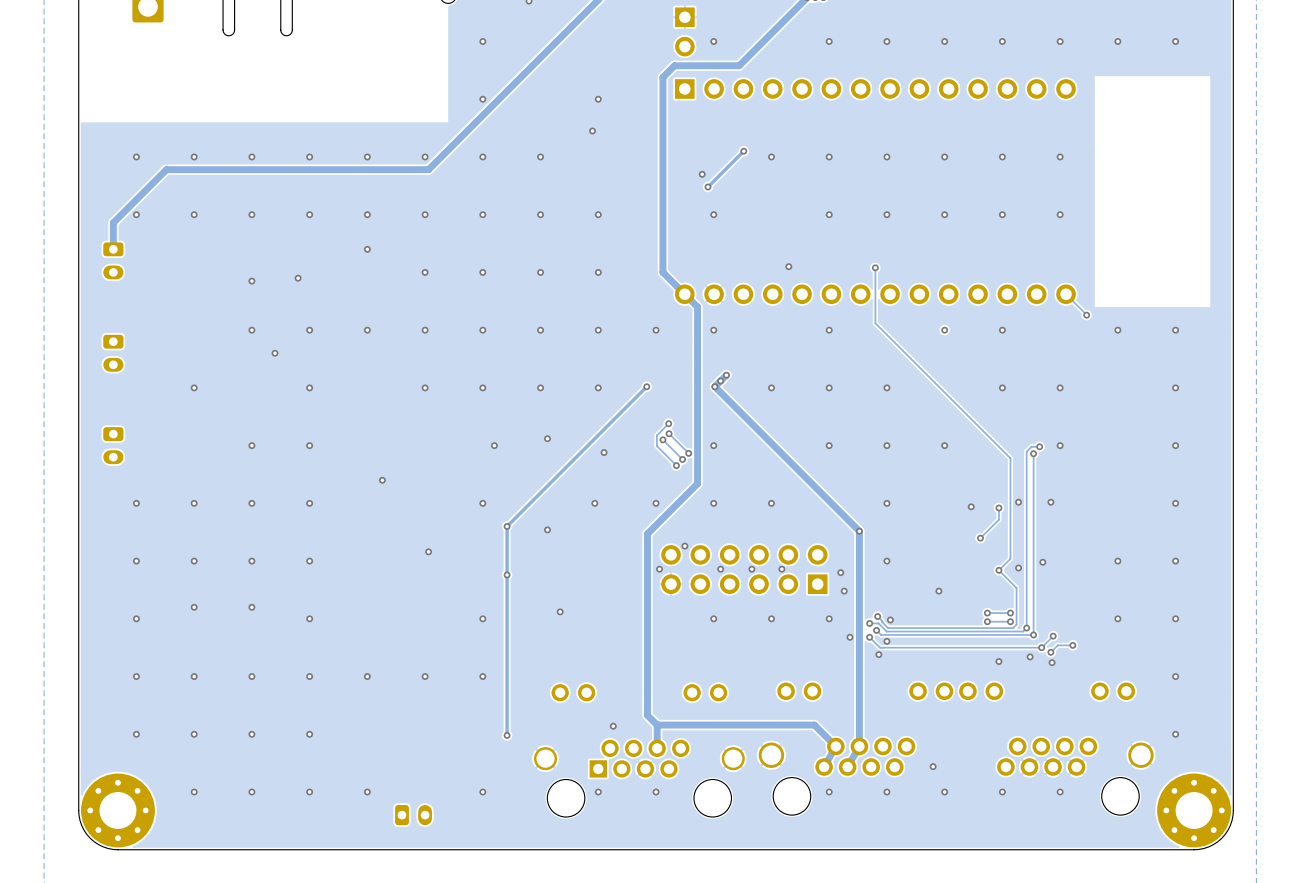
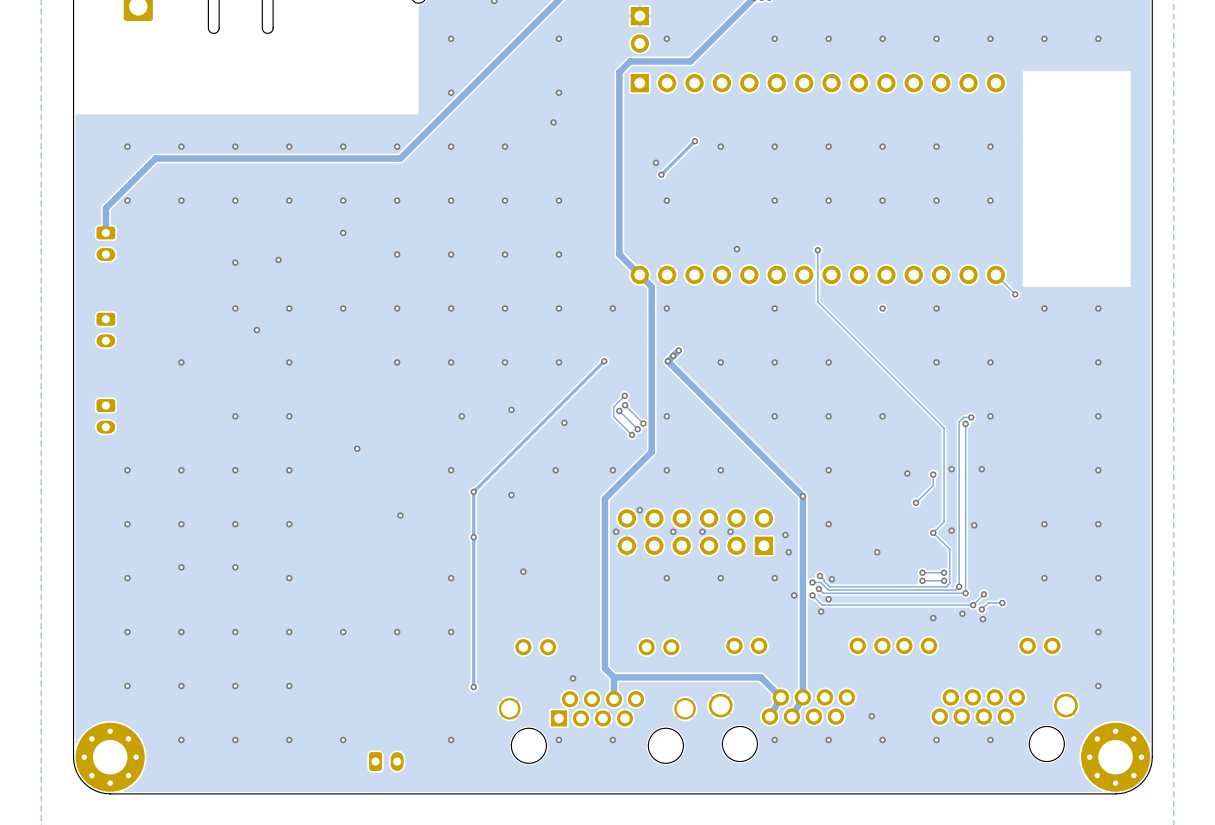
via: none -> (558, 38)

